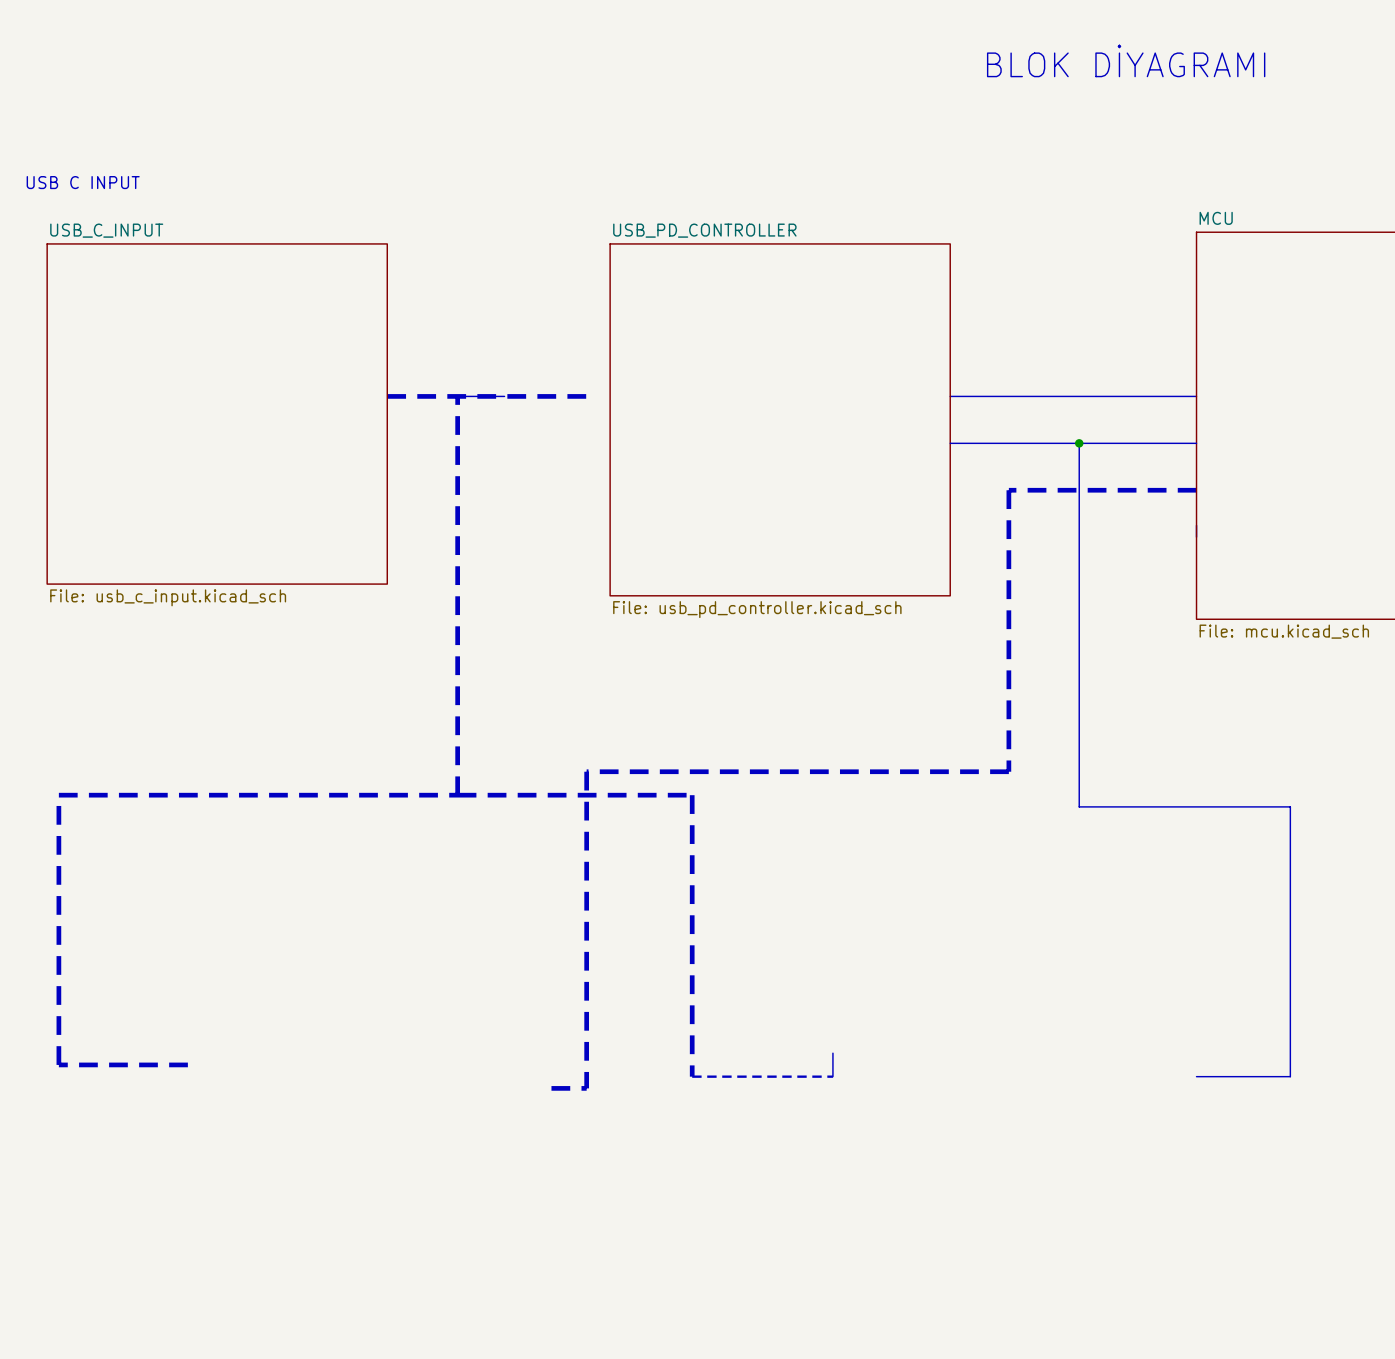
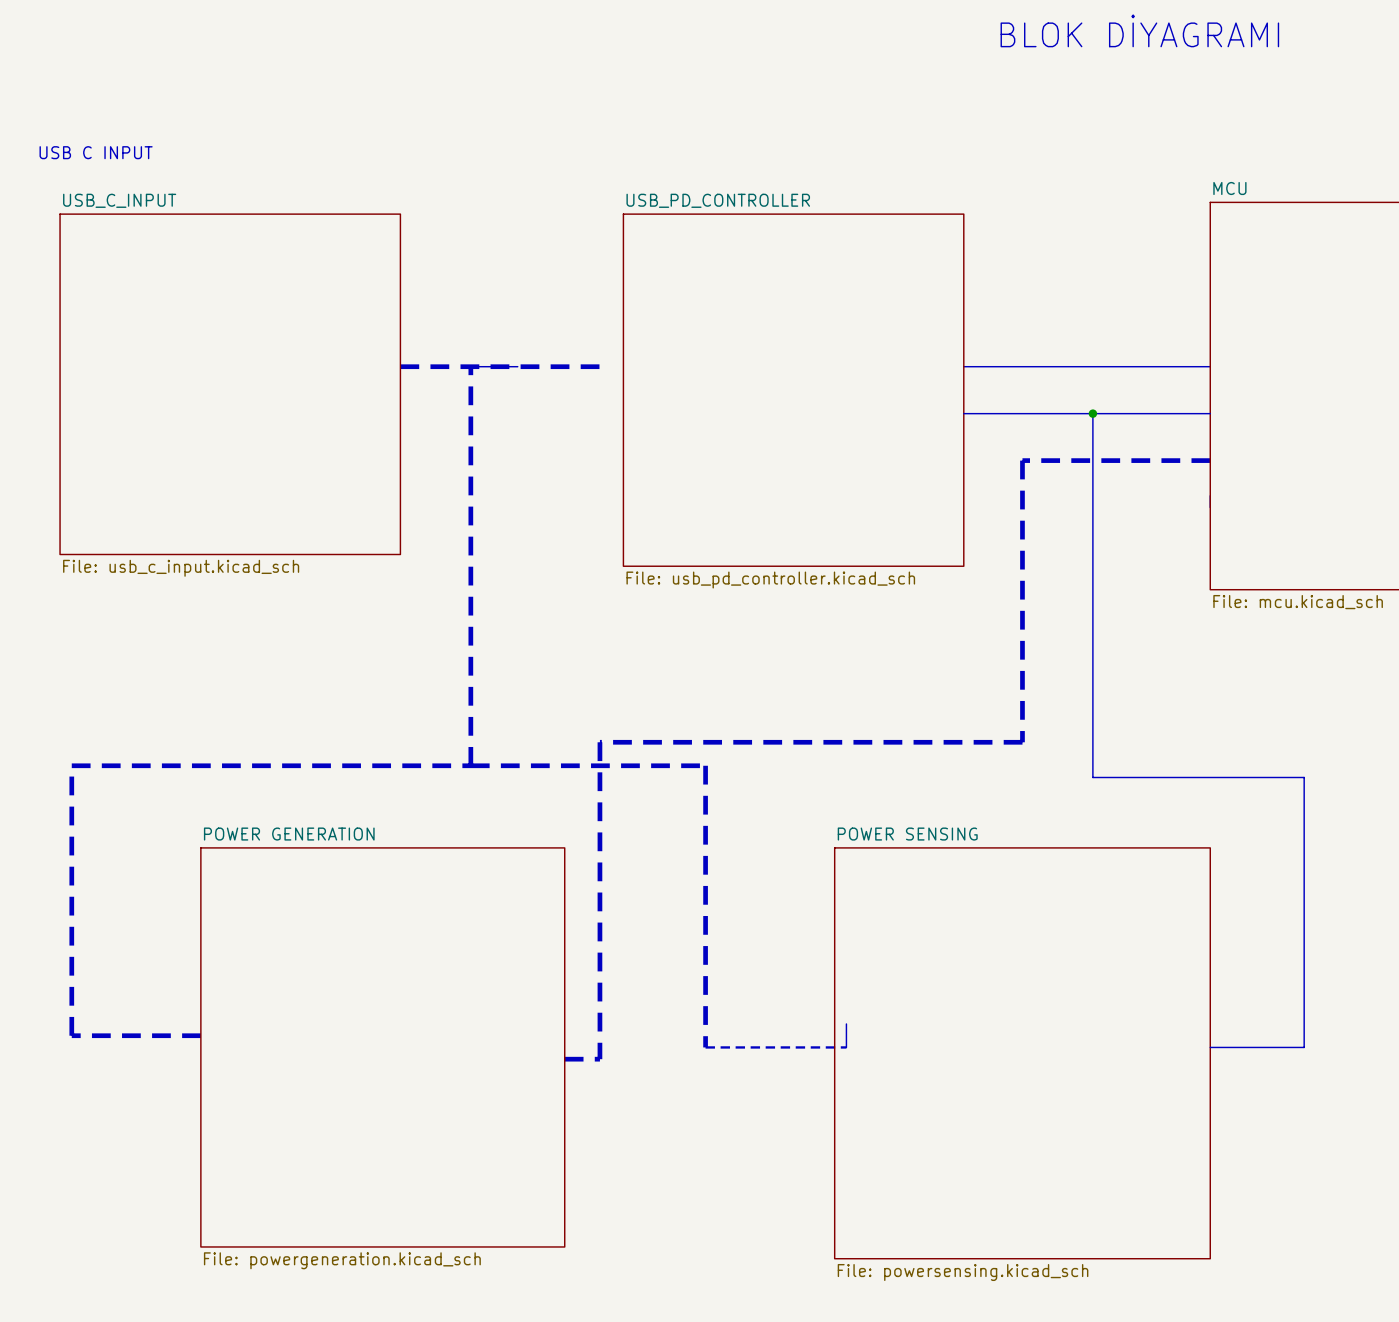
sheet POWER GENERATION: none -> File: powergeneration.kicad_sch (382, 1047)
sheet POWER SENSING: none -> File: powersensing.kicad_sch (1022, 1053)

